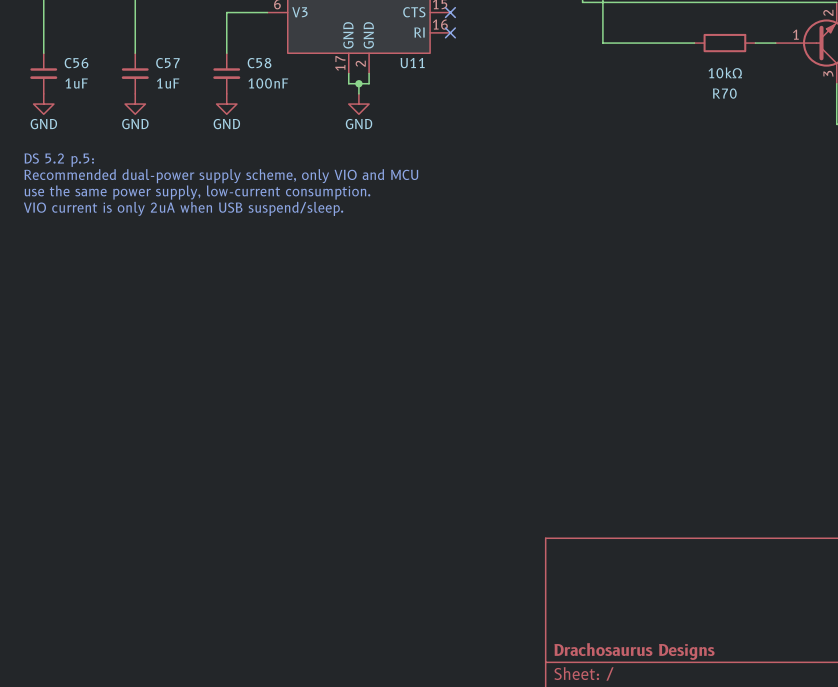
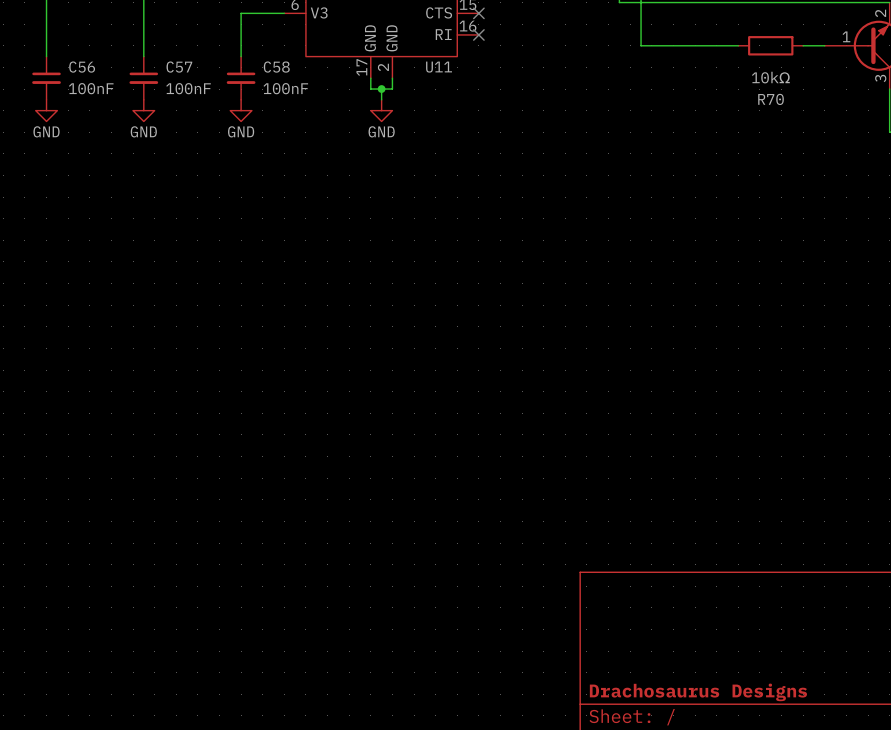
C56 value: 1uF (76, 83) -> 100nF (91, 88)
C57 value: 1uF (168, 83) -> 100nF (188, 88)
text: DS 5.2 p.5: (59, 160) -> none
text: Recommended dual-power supply scheme, only VIO and MCU (221, 176) -> none
text: use the same power supply, low-current consumption. (197, 192) -> none
text: VIO current is only 2uA when USB suspend/sleep. (183, 208) -> none

